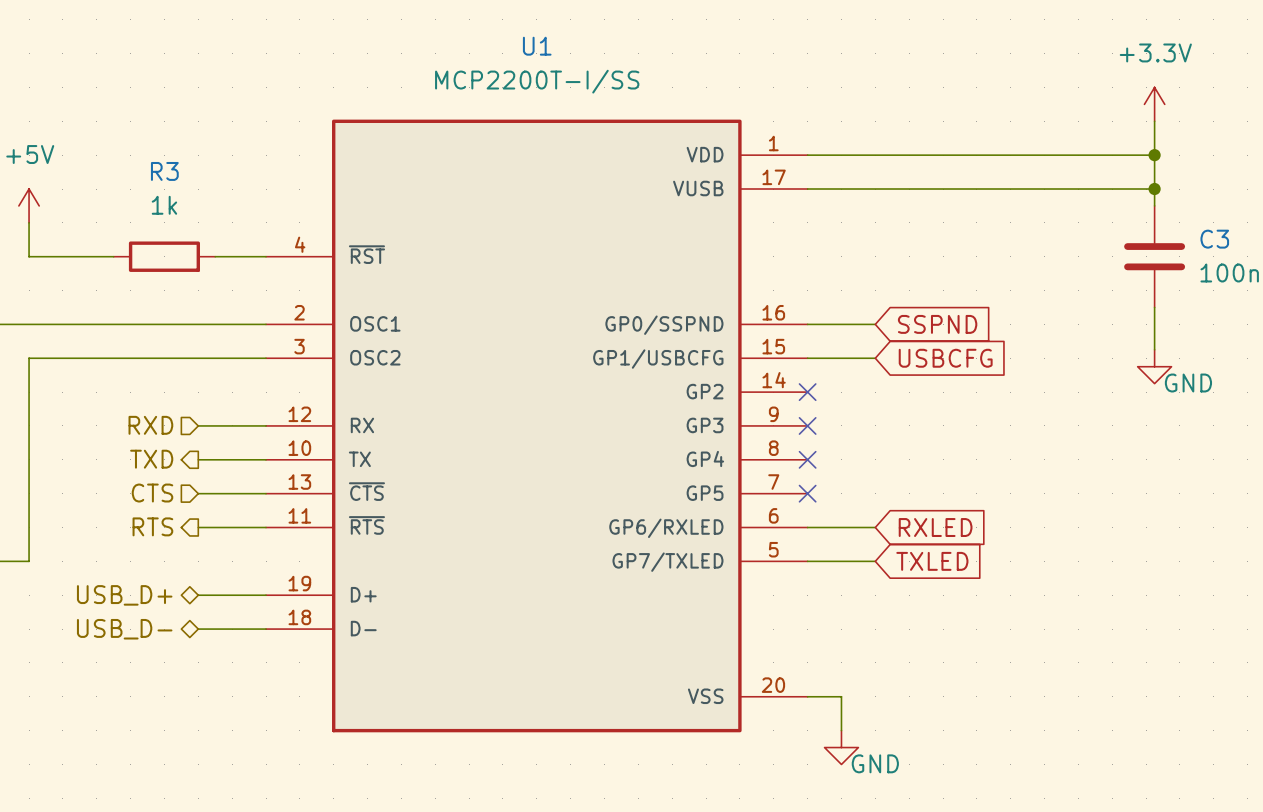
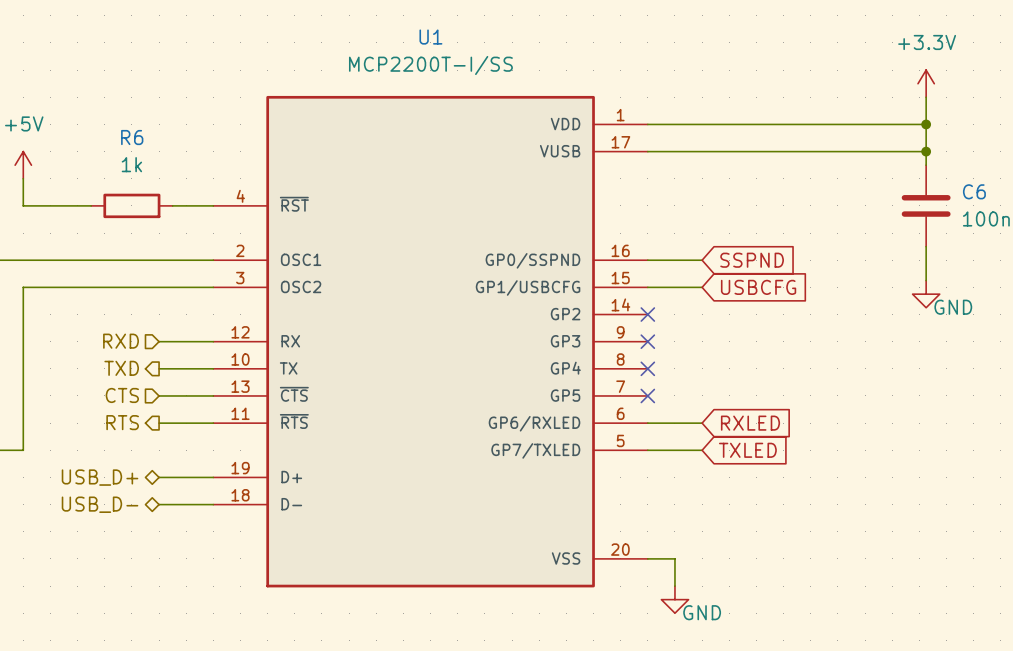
R3 name: R3 (164, 171) -> R6 (132, 137)
C3 name: C3 (1214, 239) -> C6 (974, 191)

